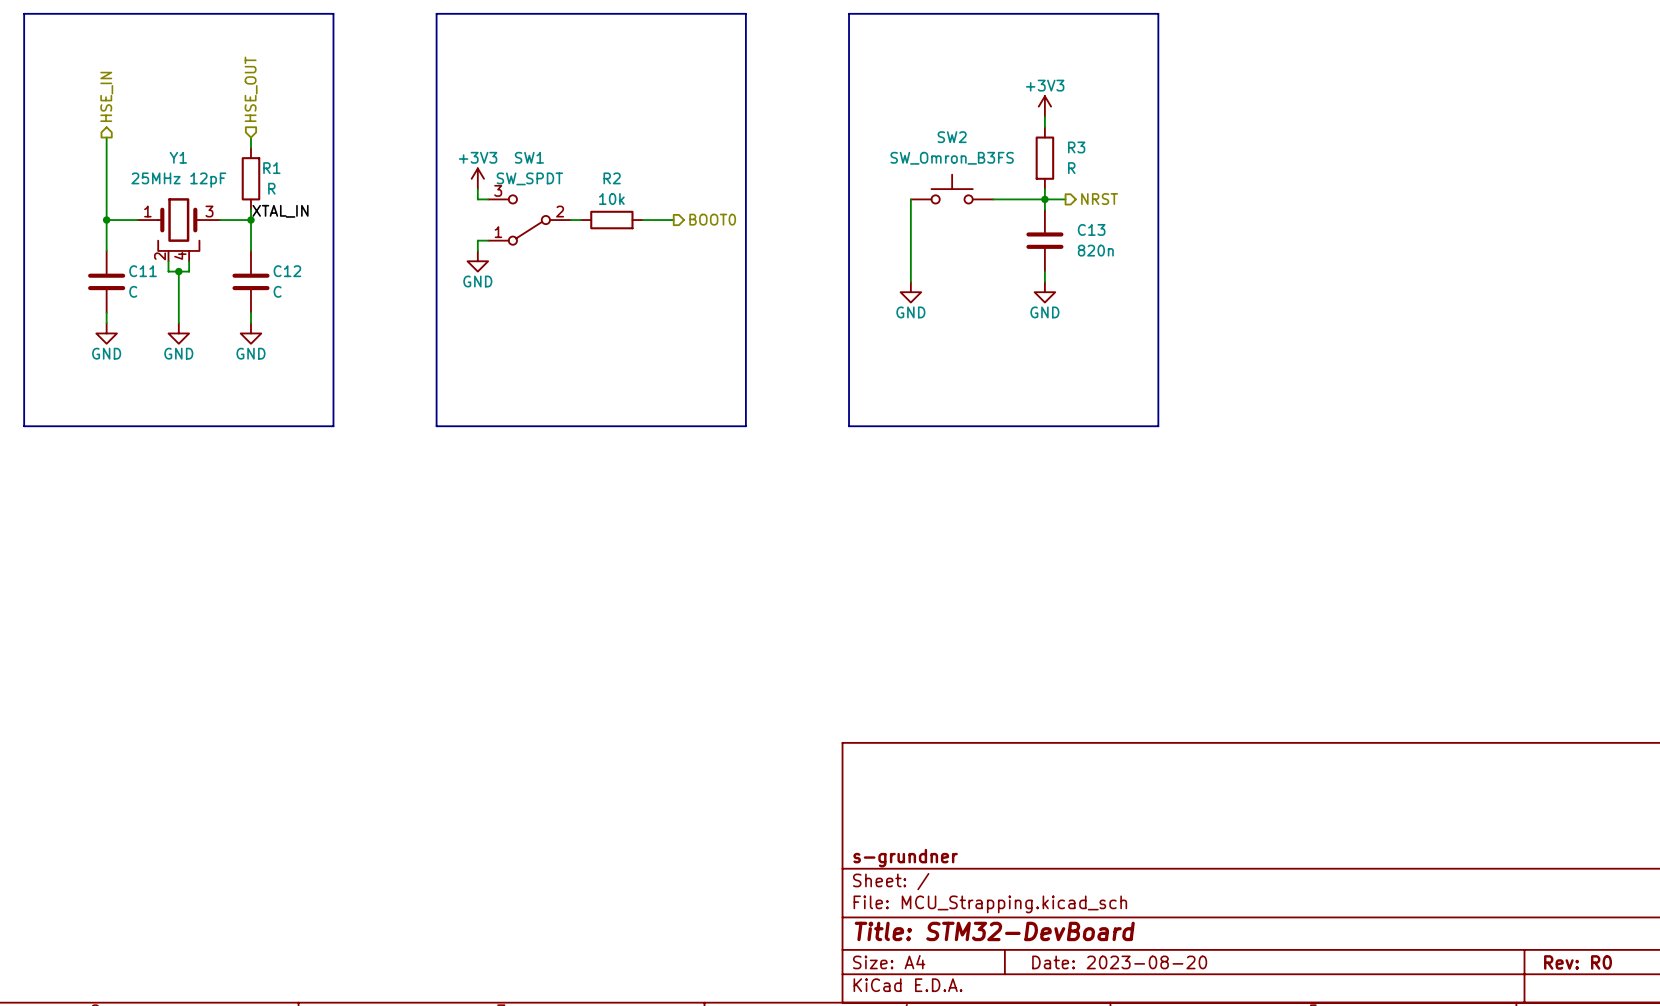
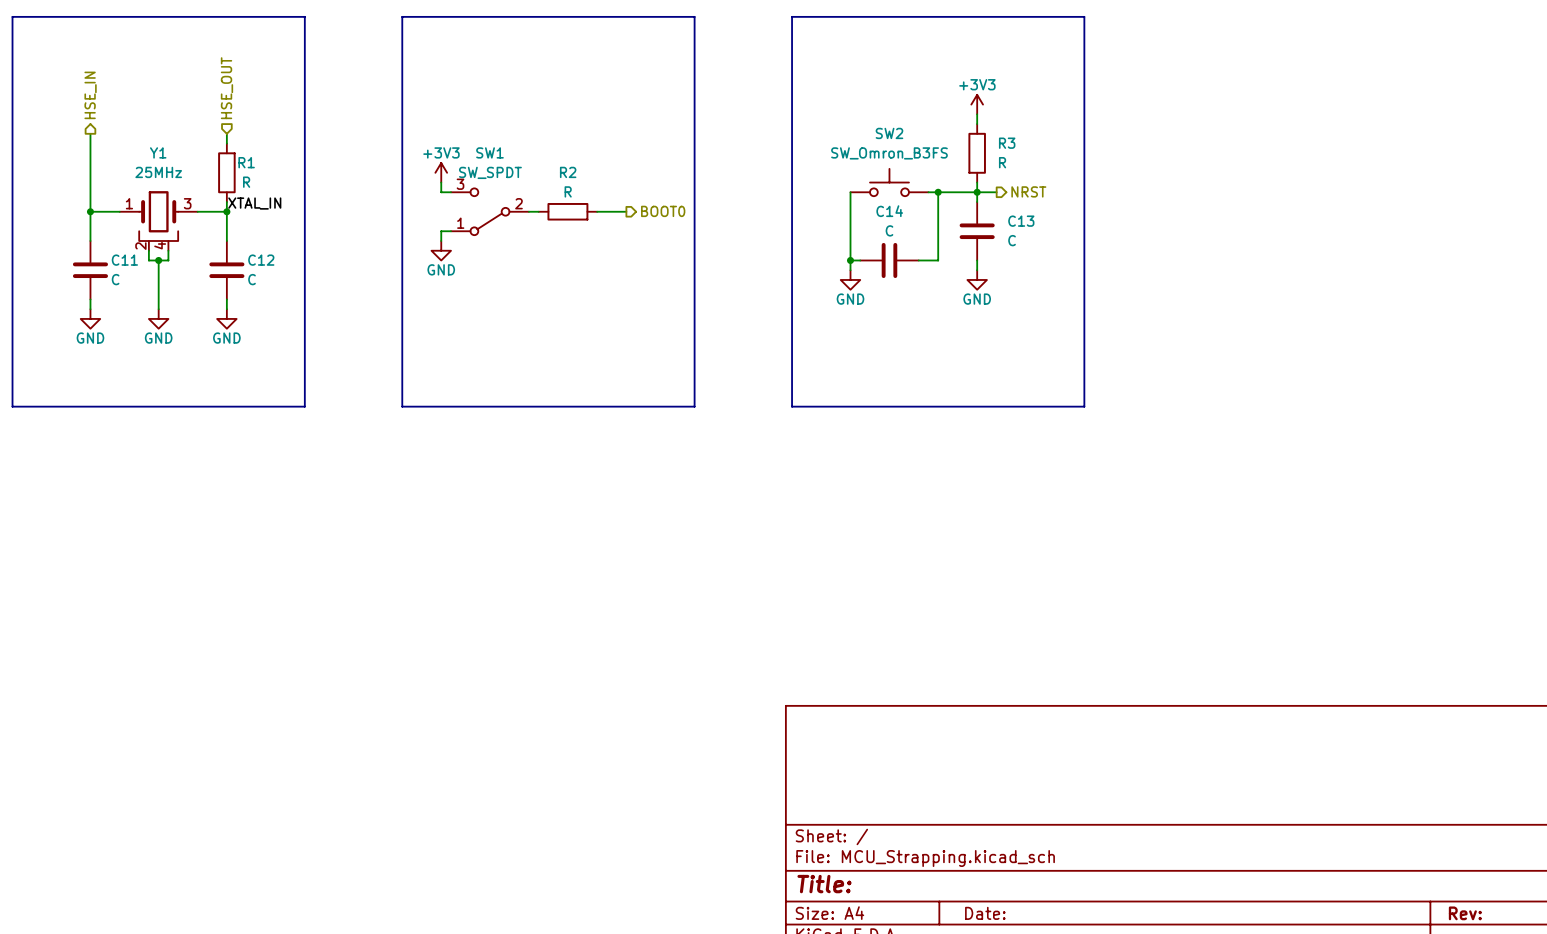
Y1 value: 25MHz 12pF (178, 180) -> 25MHz (158, 172)
R2 value: 10k (611, 199) -> R (568, 191)
wire: none -> (938, 192) (938, 260) (918, 260)
junction: none -> (938, 192)
C13 value: 820n (1095, 250) -> C (1012, 240)
wire: none -> (850, 260) (860, 260)
junction: none -> (850, 260)
C14: none -> C (889, 260)
title block: s-grundner (905, 858) -> none
title block: Title: STM32-DevBoard (994, 931) -> Title: (824, 884)
title block: Date: 2023-08-20 (1119, 962) -> Date: (985, 913)
title block: Rev: R0 (1578, 962) -> Rev: (1465, 913)

